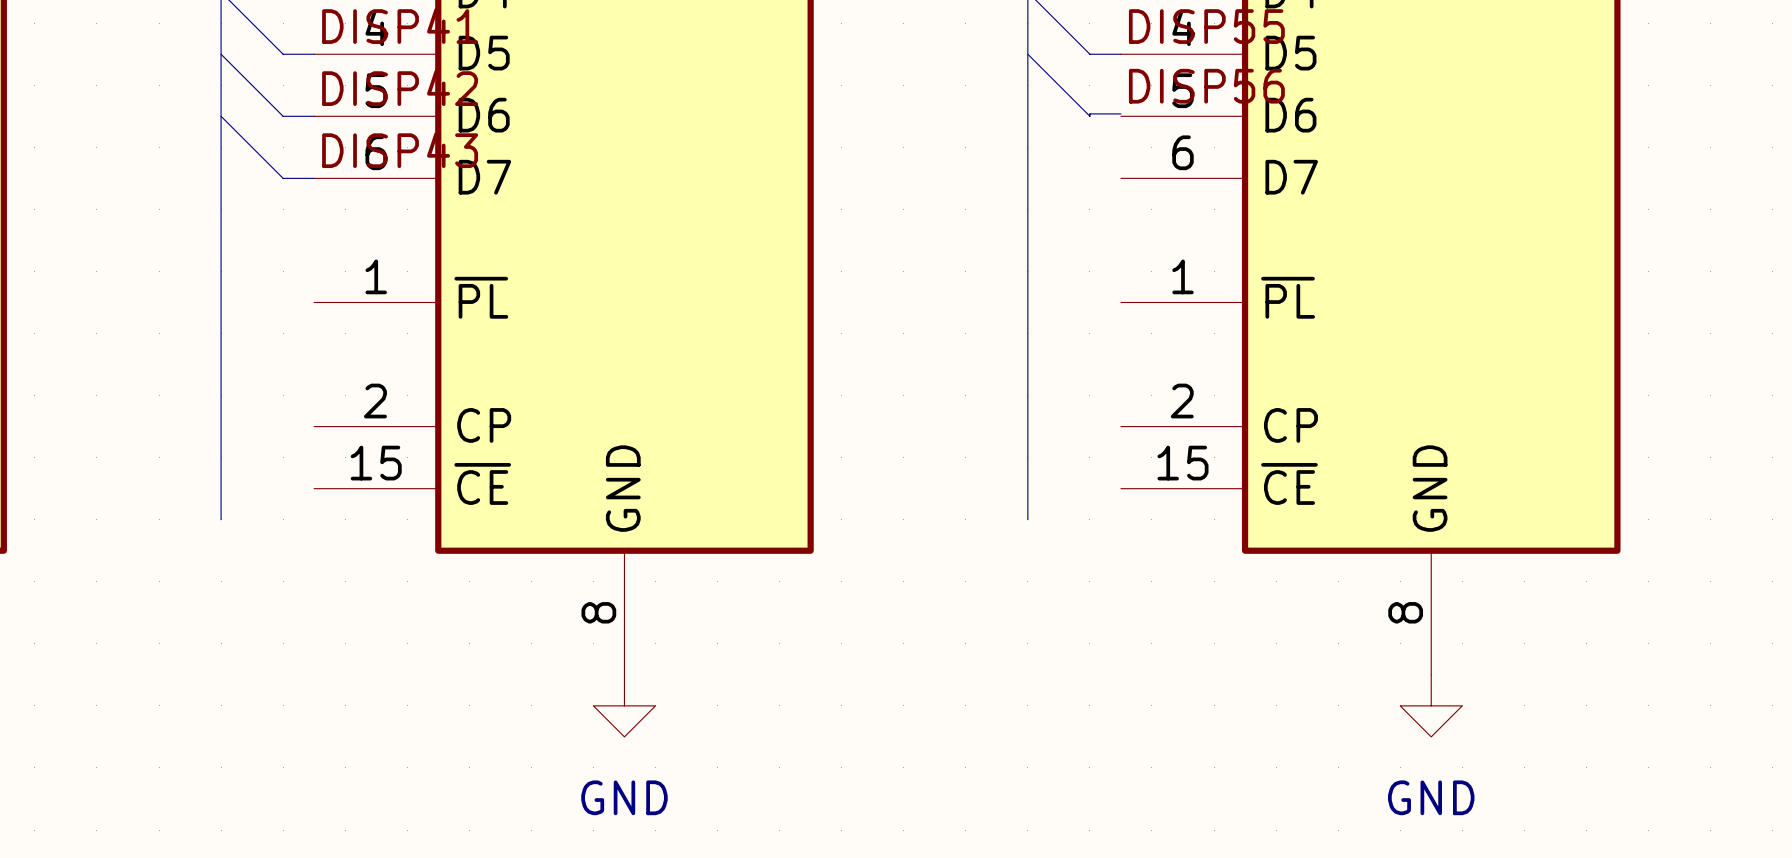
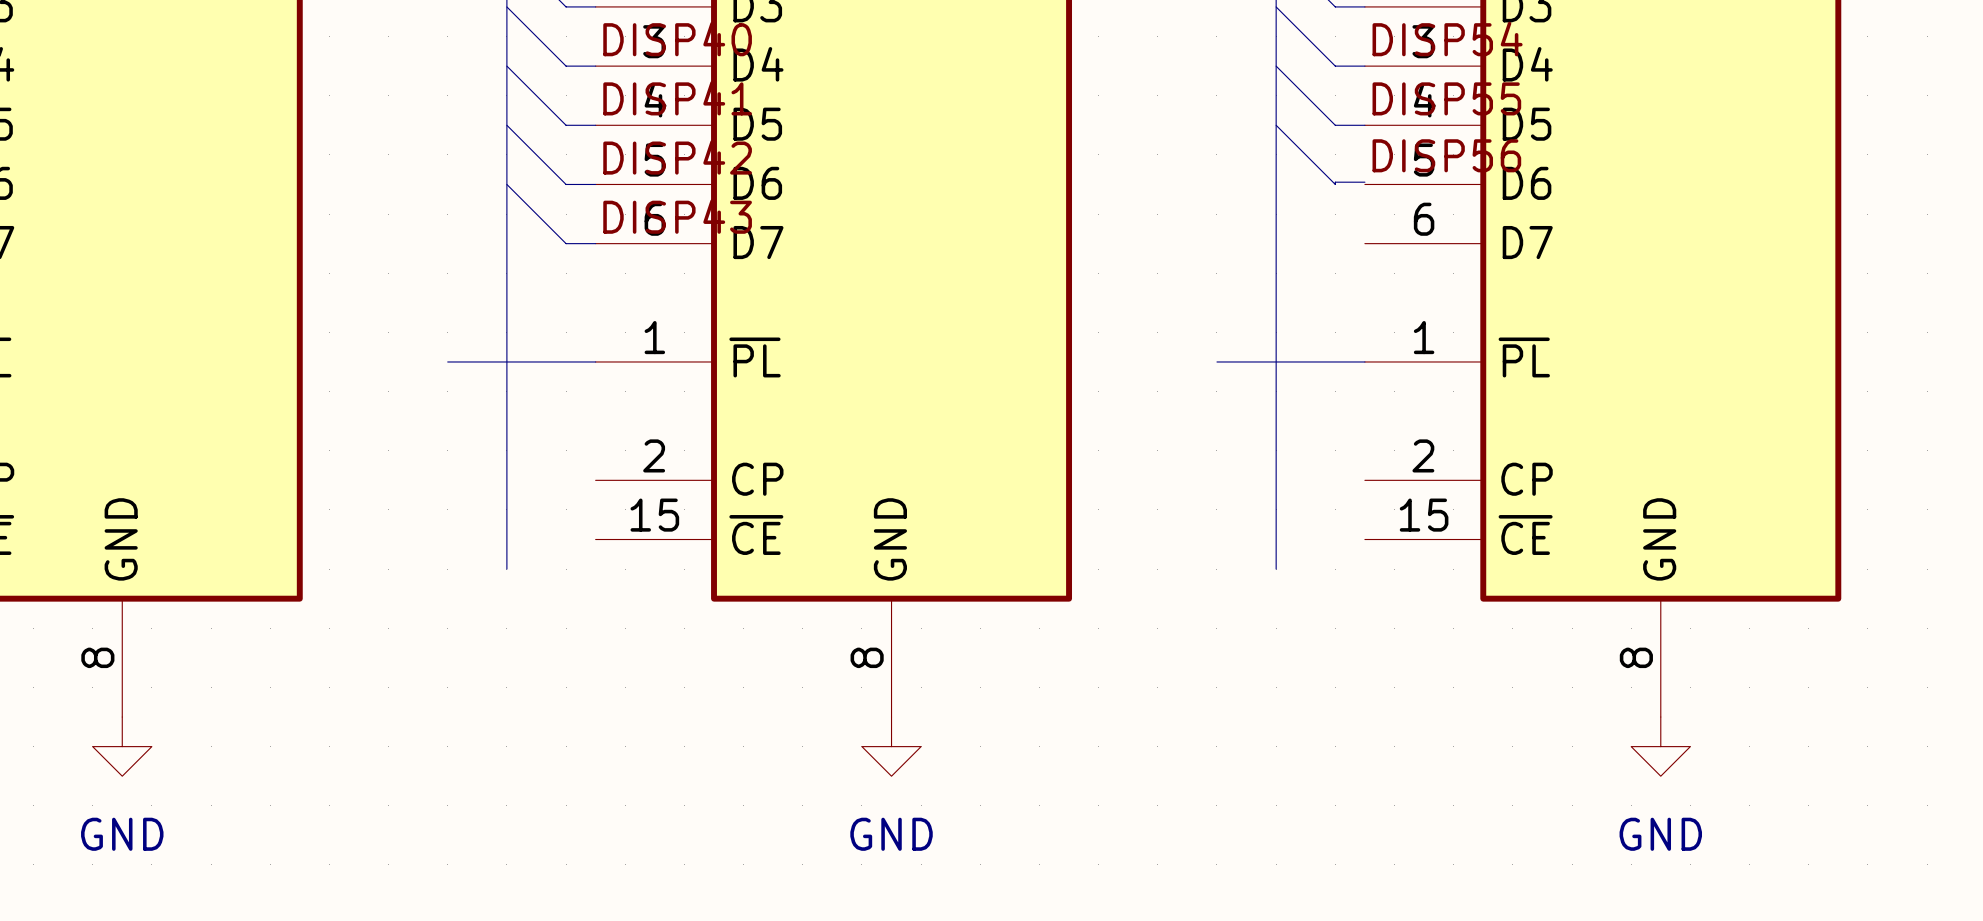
wire: none -> (447, 361) (595, 361)
wire: none -> (1216, 361) (1364, 361)

